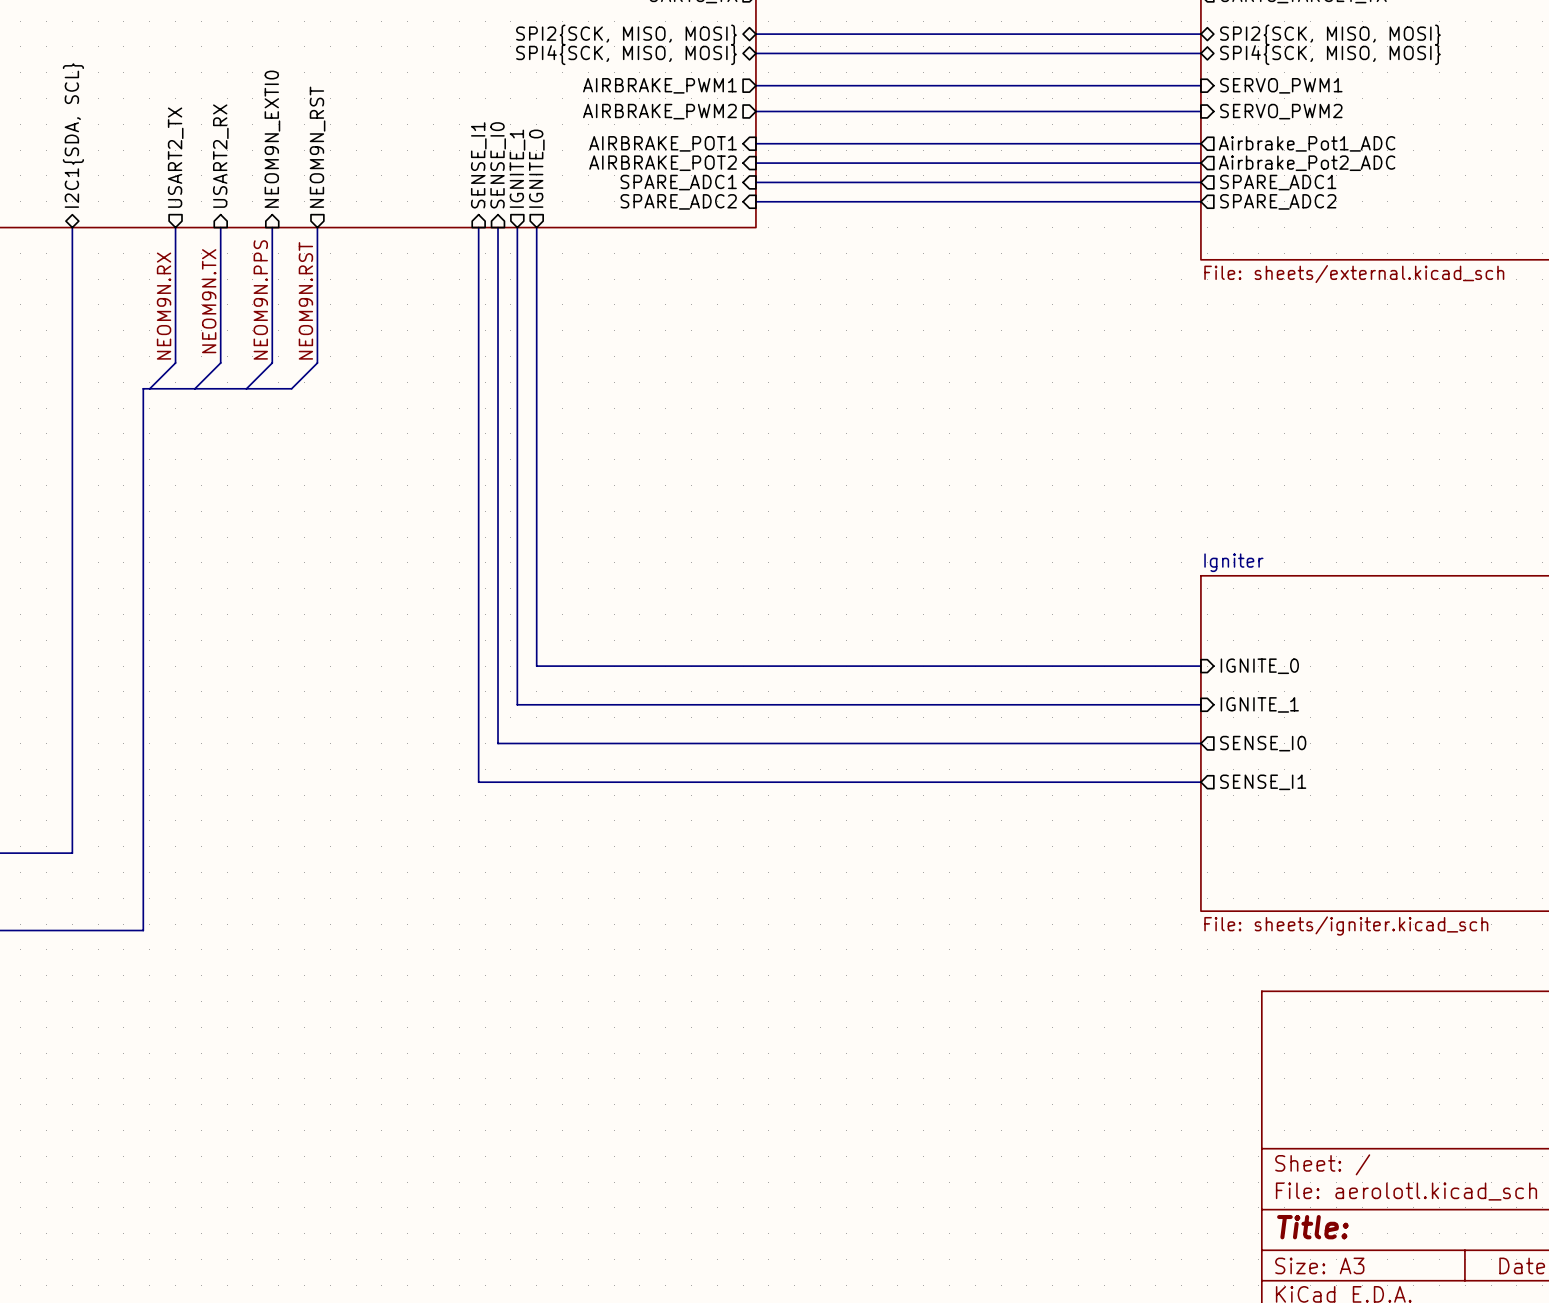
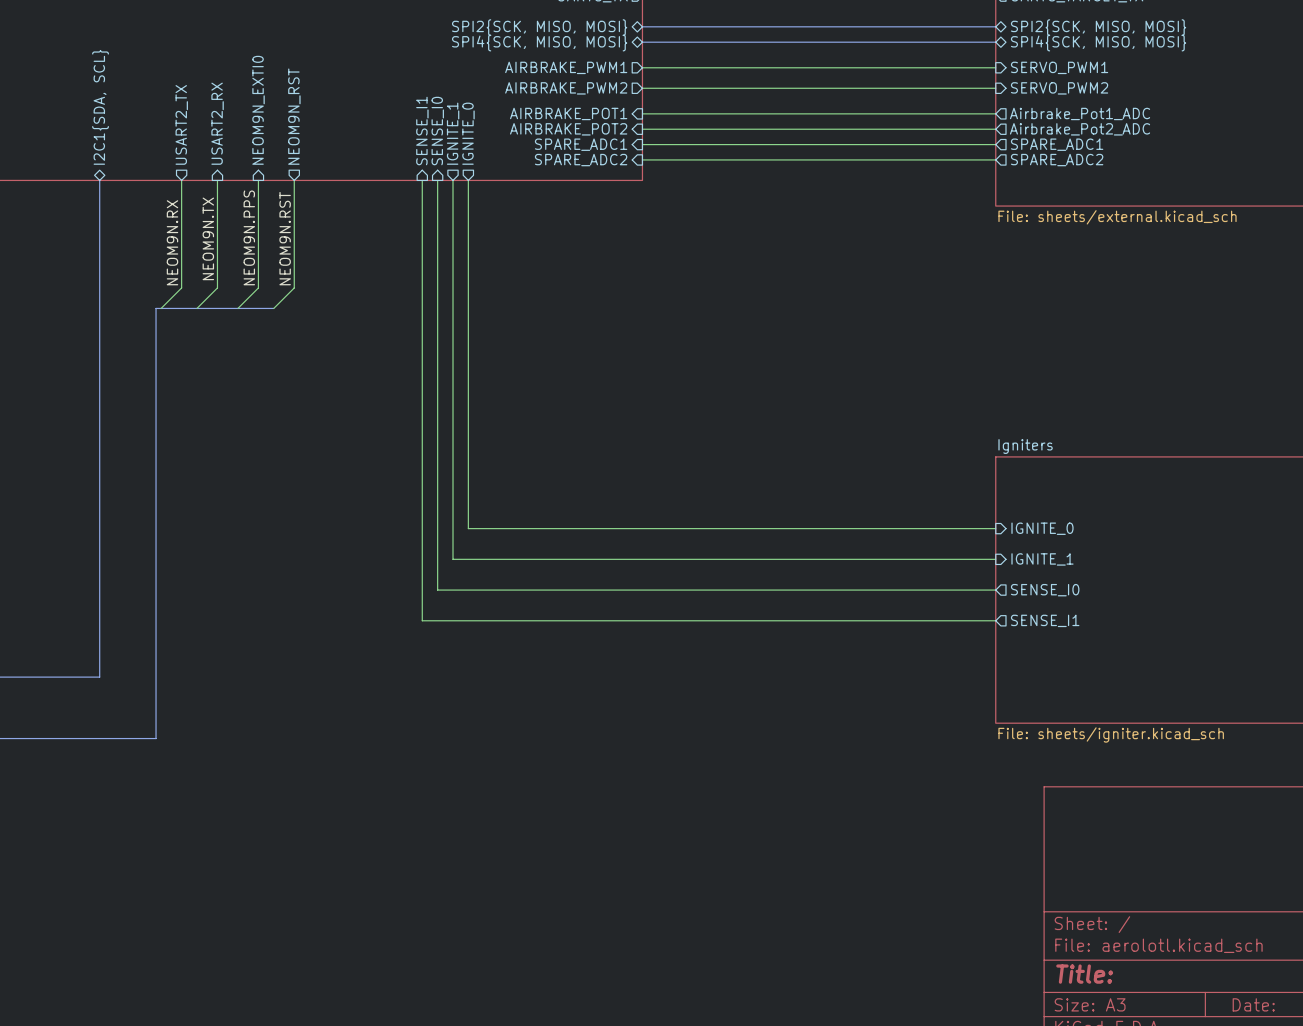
sheet Igniter name: Igniter (1233, 562) -> Igniters (1025, 446)

